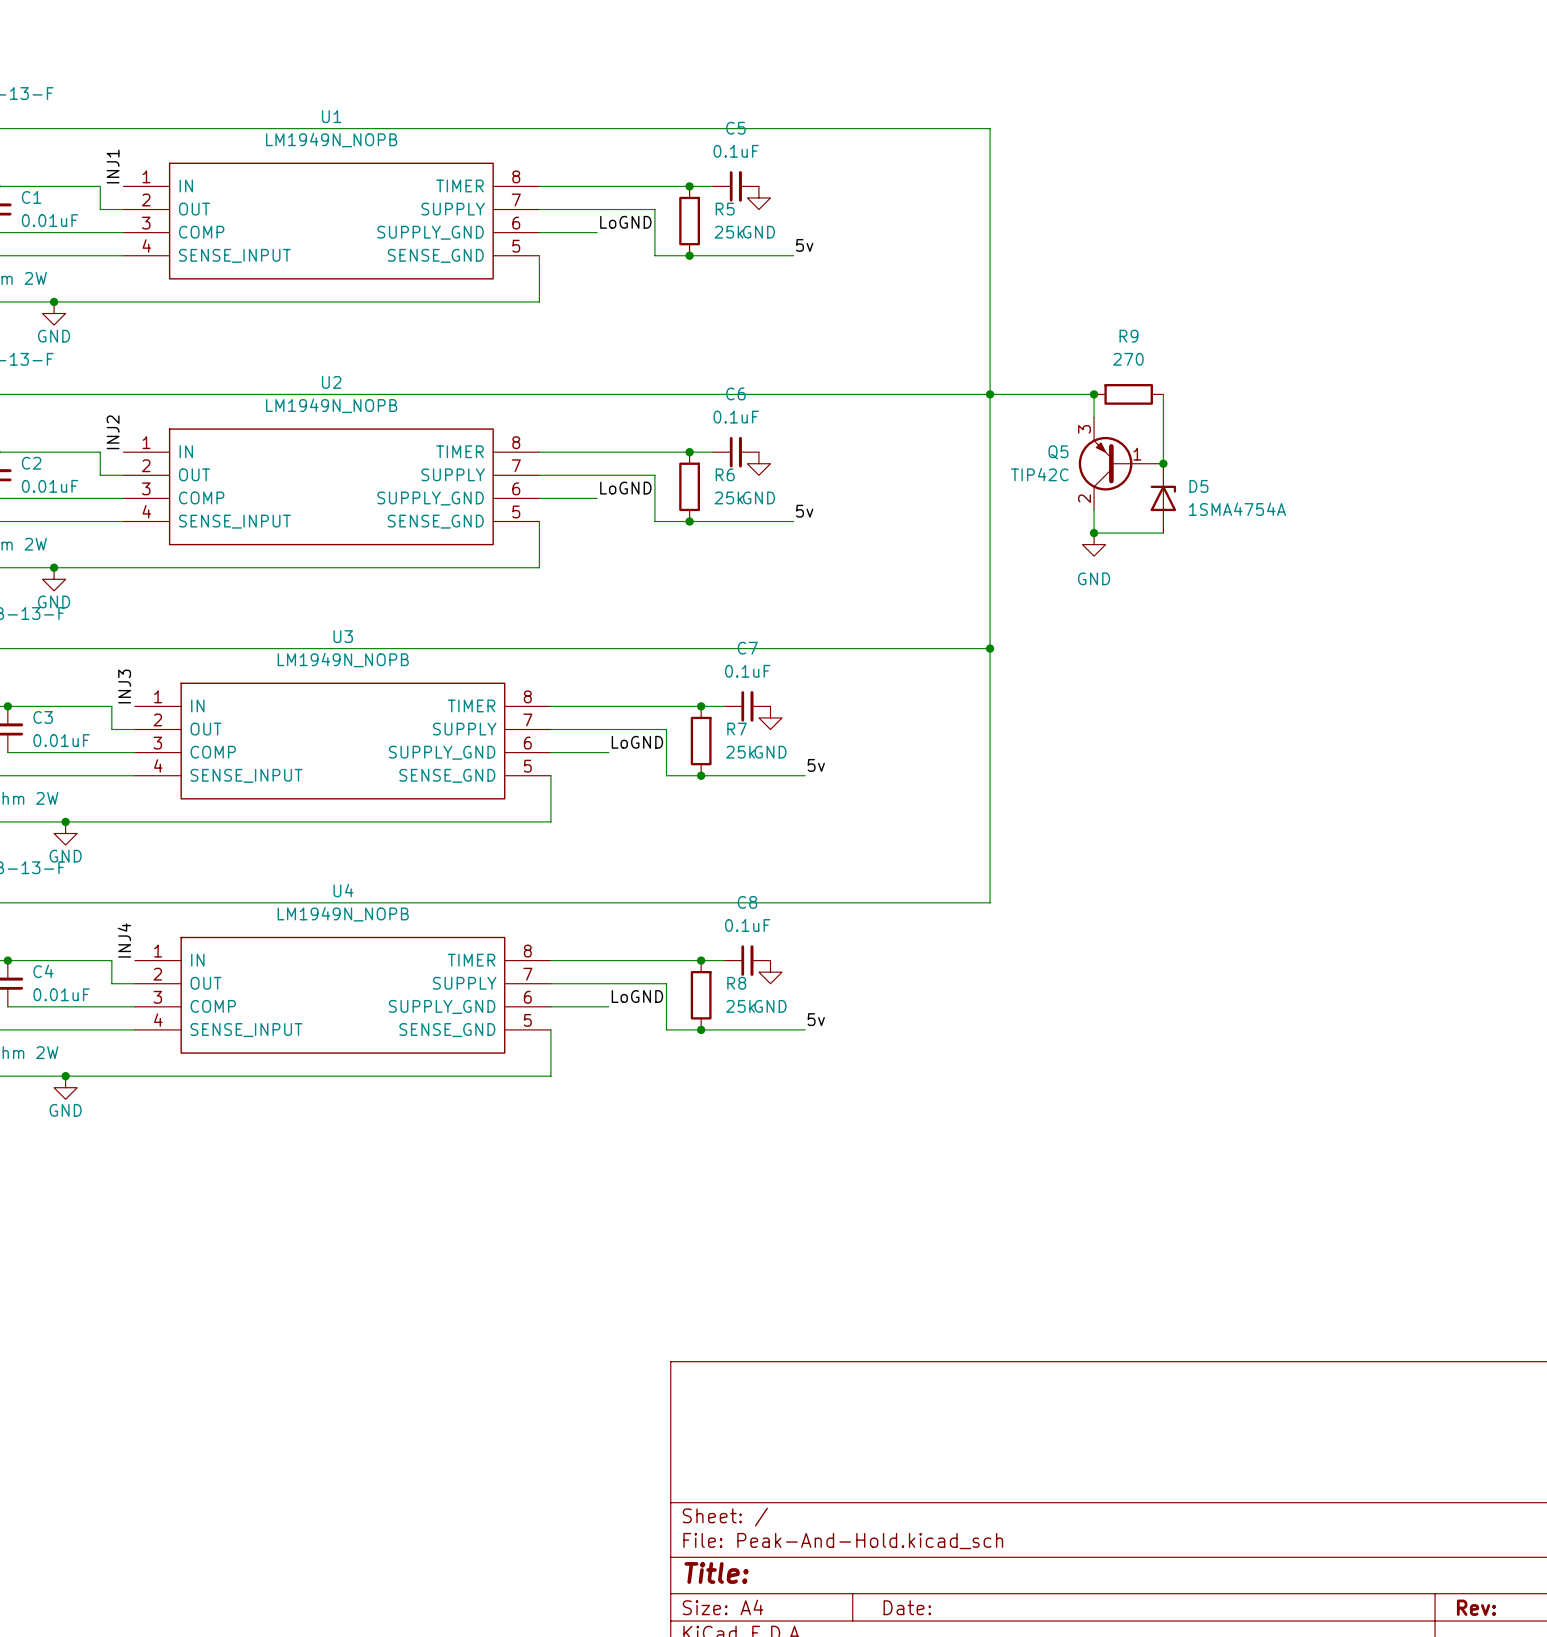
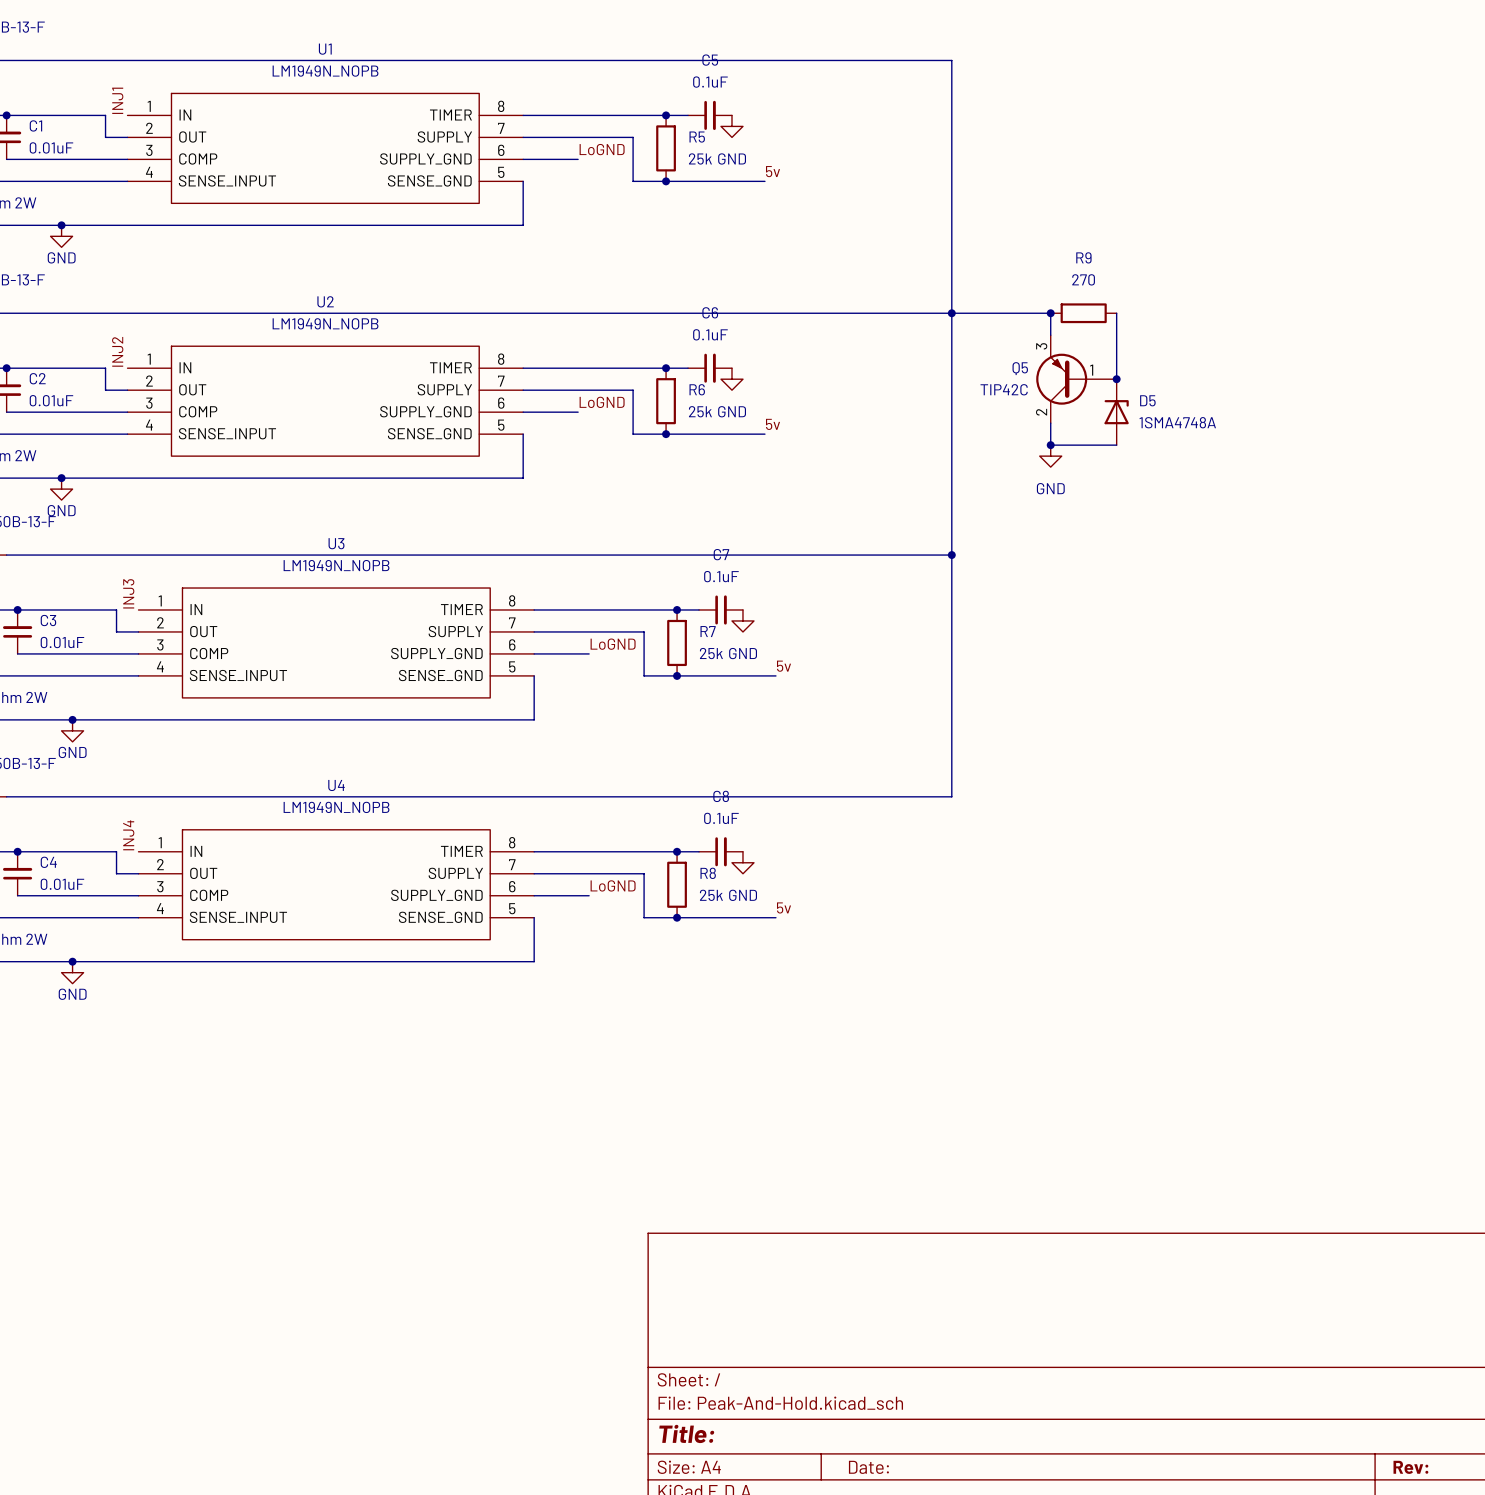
D5 value: 1SMA4754A (1237, 509) -> 1SMA4748A (1177, 422)

